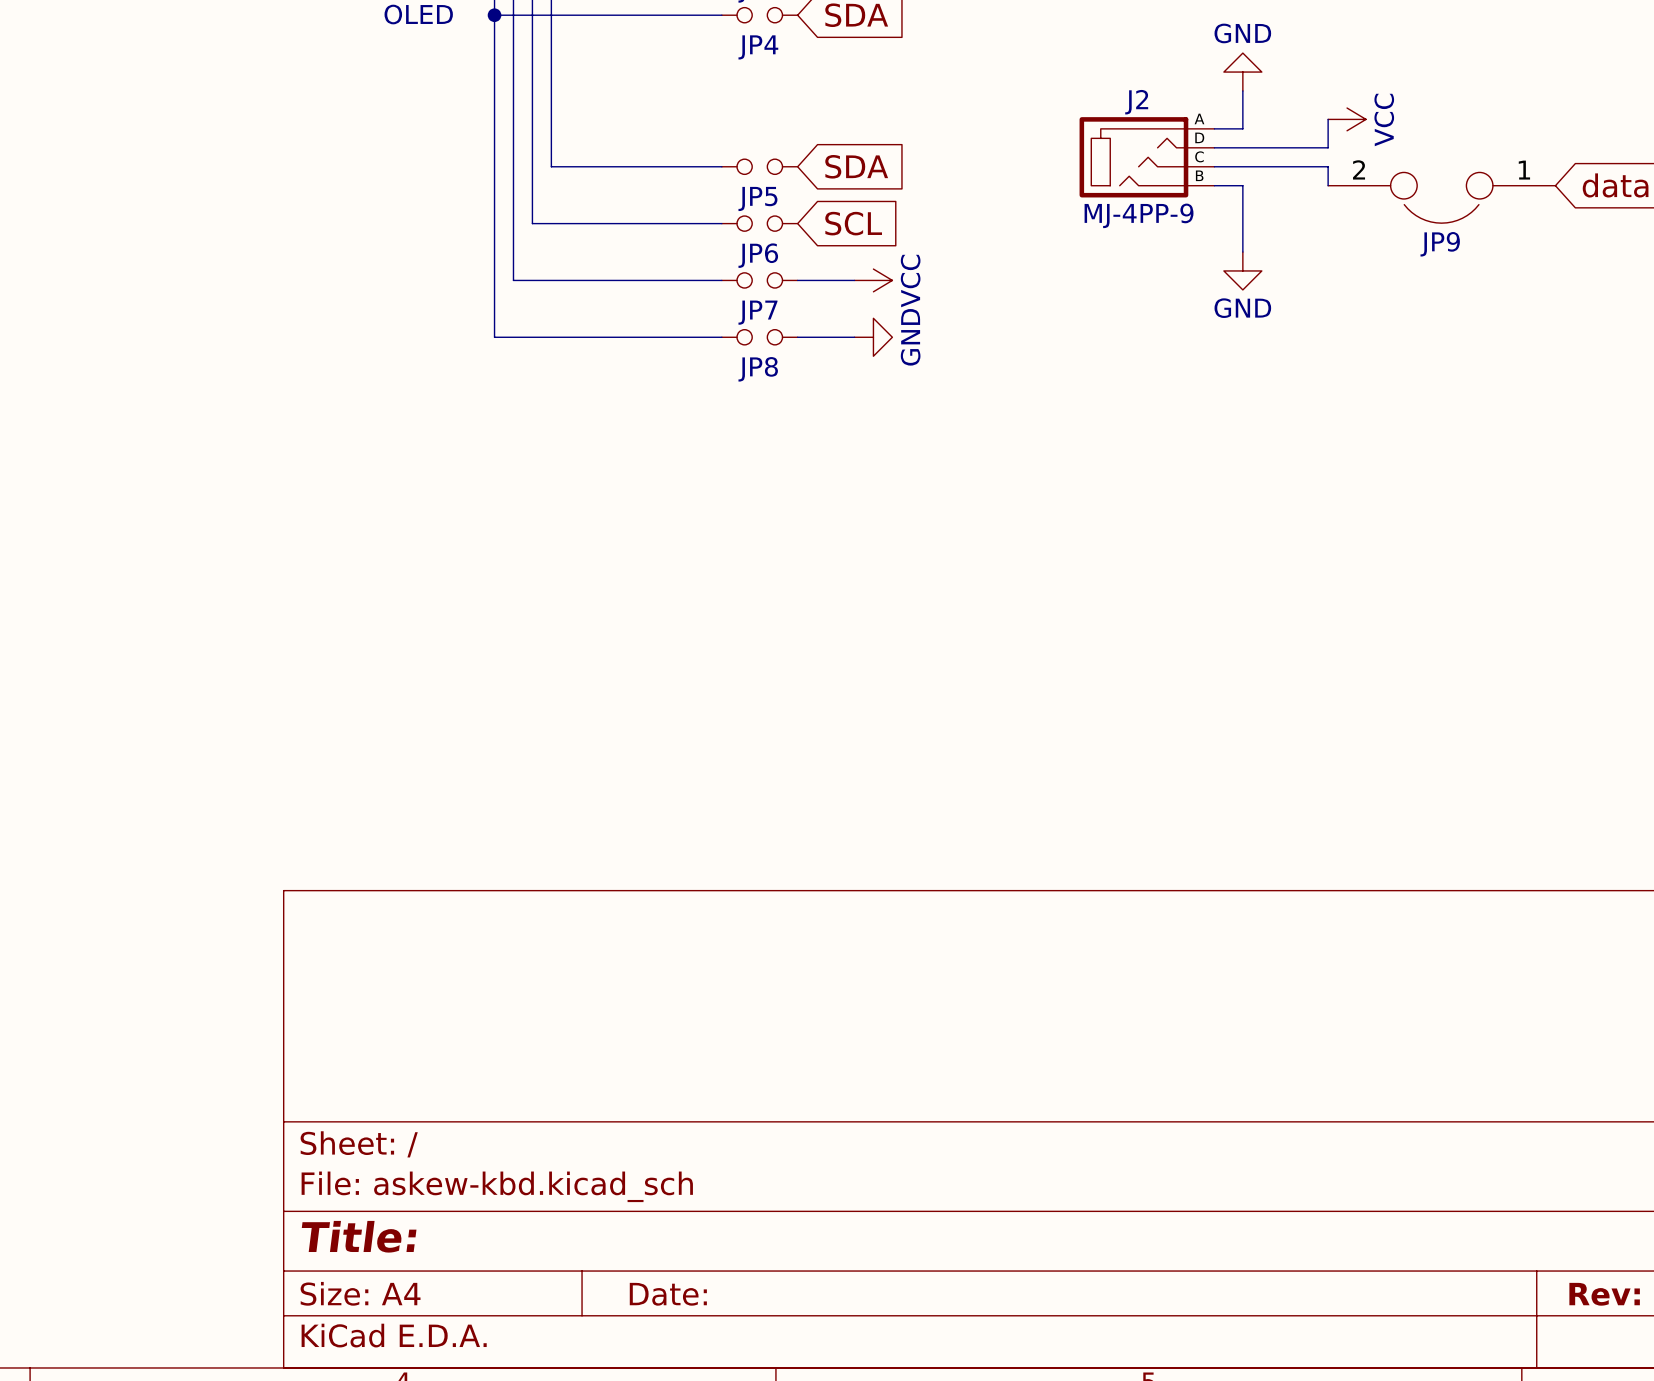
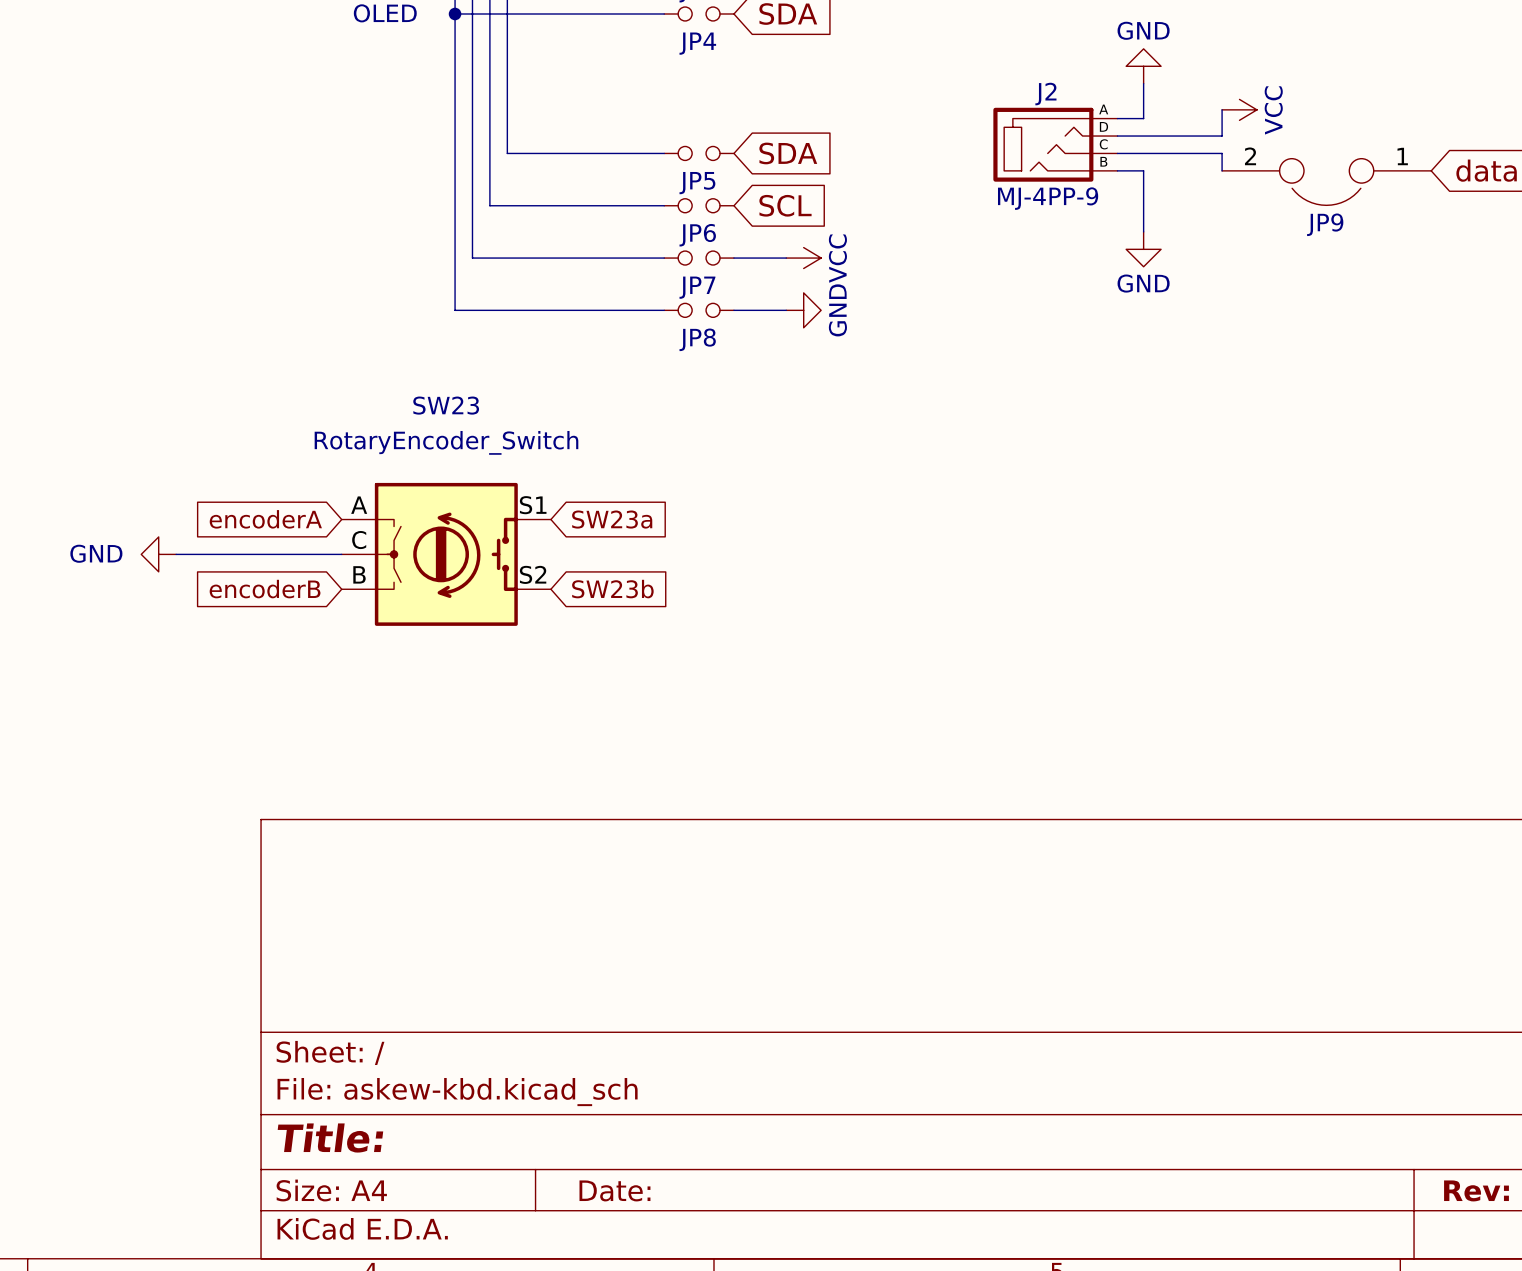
global label: none -> encoderA (265, 519)
global label: none -> SW23a (612, 519)
power symbol: none -> GND (158, 554)
wire: none -> (176, 554) (341, 554)
SW23: none -> RotaryEncoder_Switch (446, 554)
global label: none -> encoderB (265, 589)
global label: none -> SW23b (612, 589)

